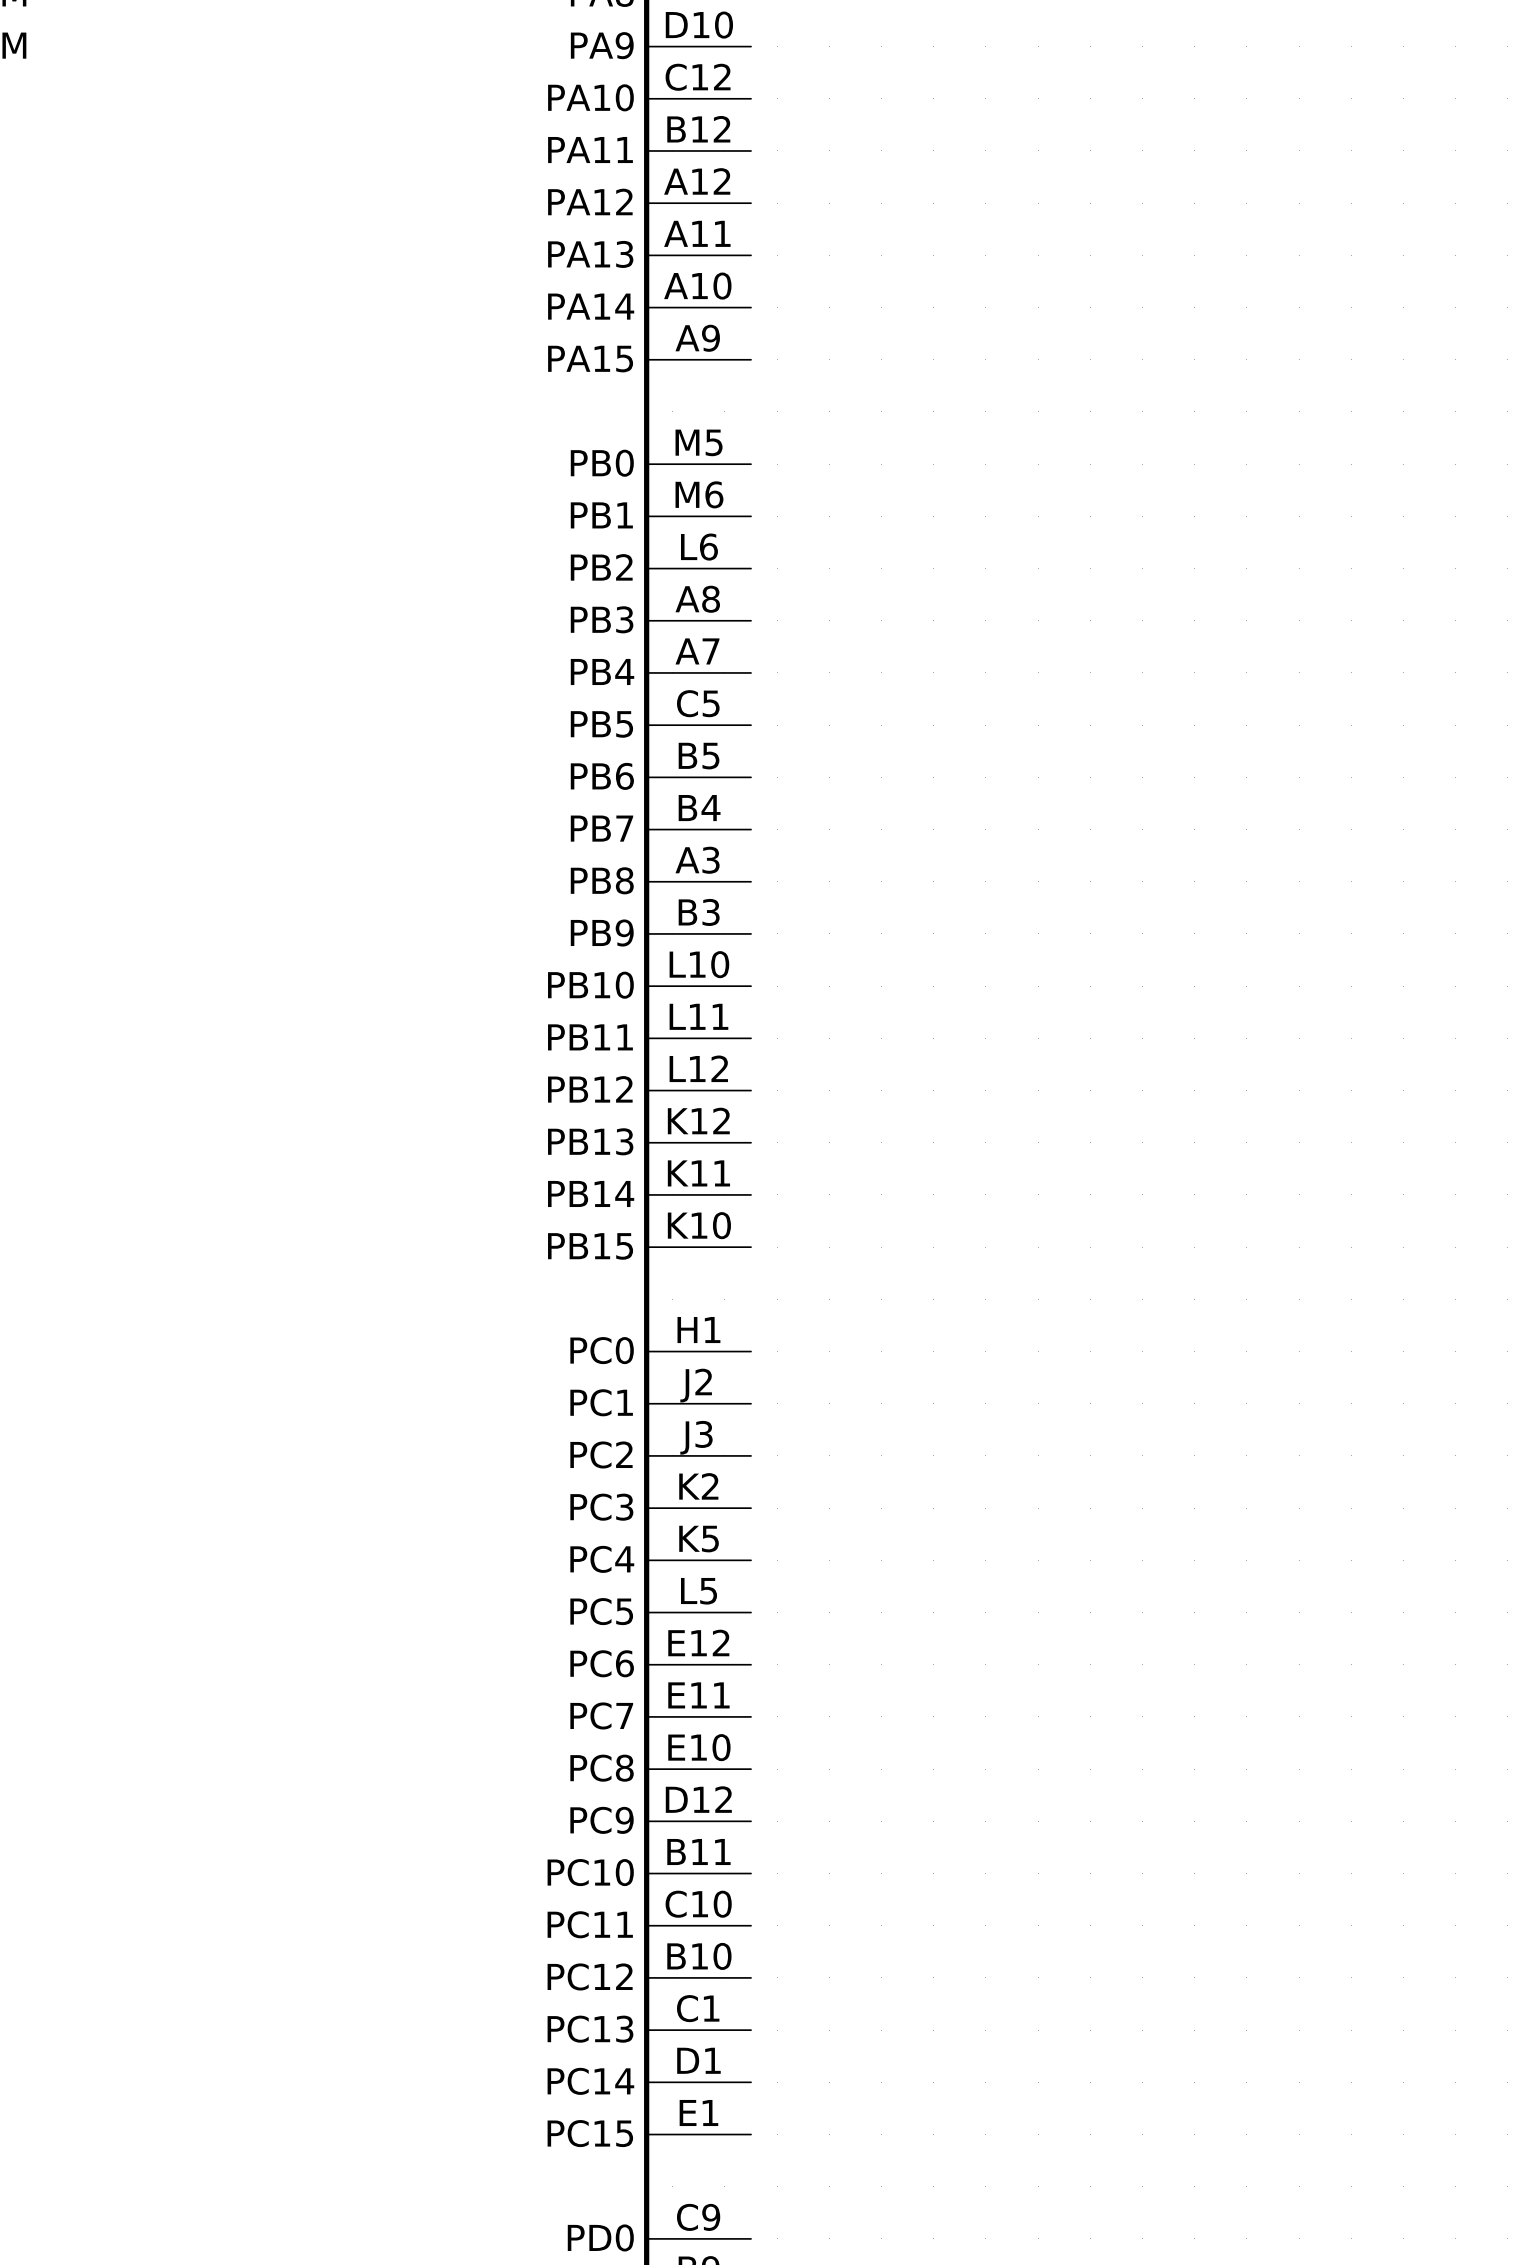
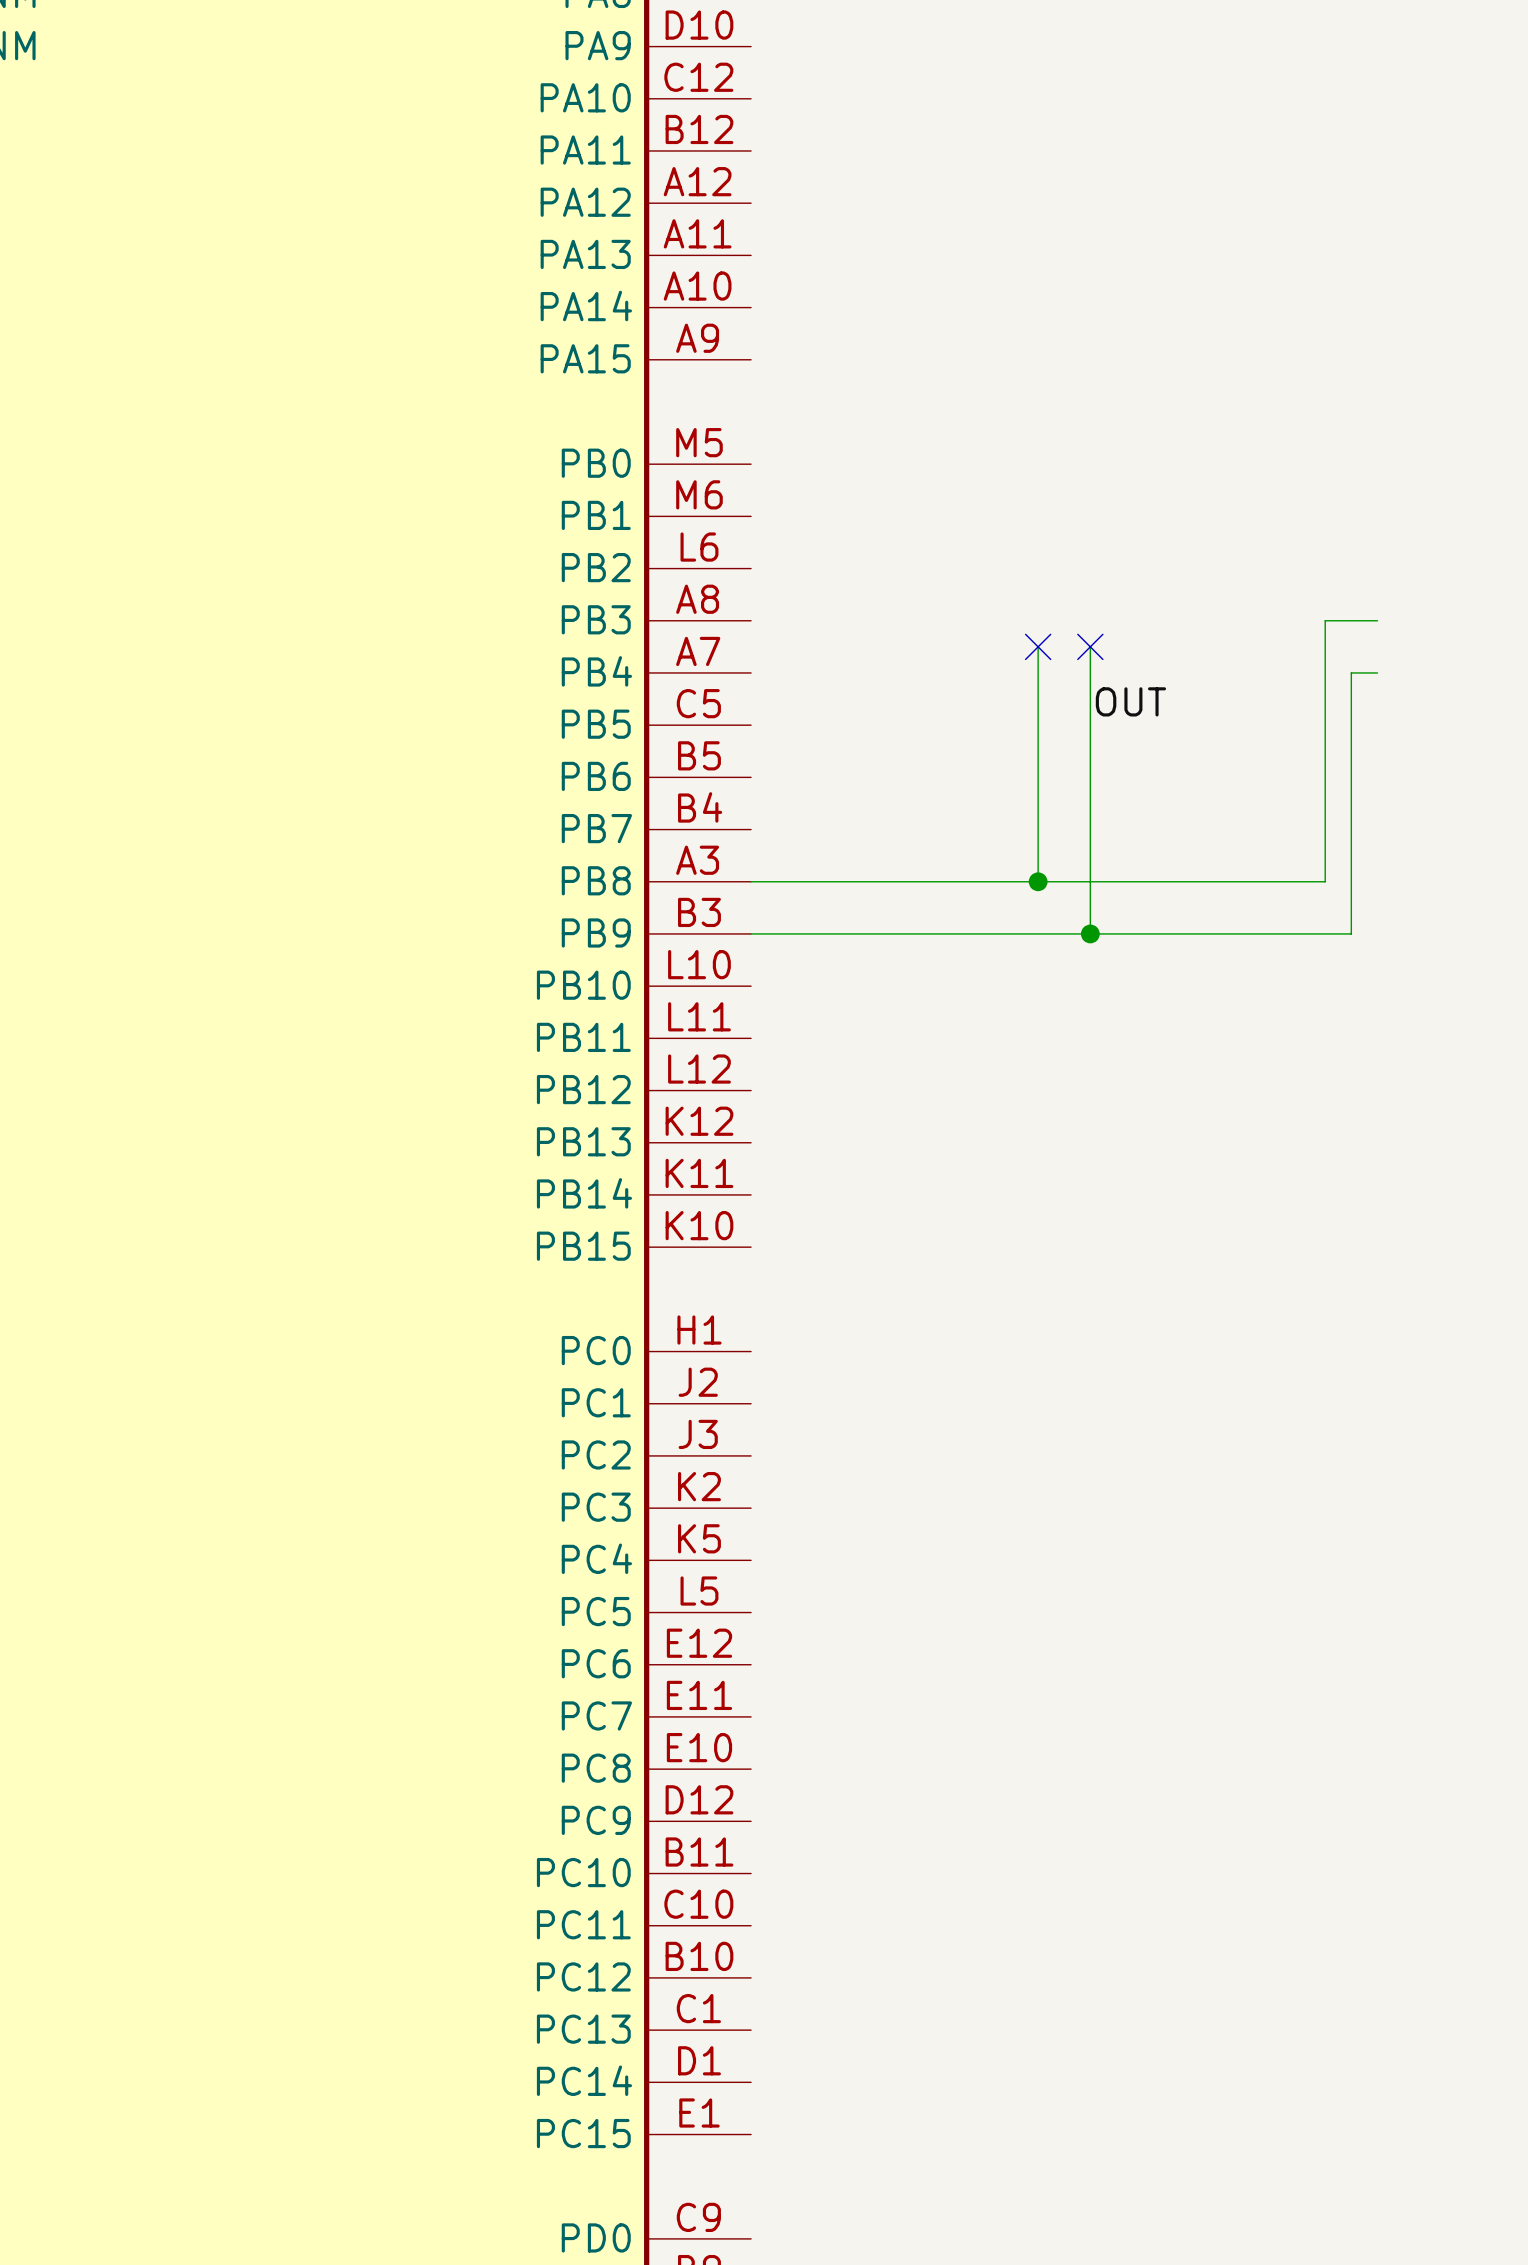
wire: none -> (1377, 620) (1325, 620) (1325, 881) (751, 881)
wire: none -> (1038, 646) (1038, 881)
no-connect mark: none -> (1038, 646)
wire: none -> (1090, 646) (1090, 933)
no-connect mark: none -> (1090, 646)
wire: none -> (1377, 672) (1351, 672) (1351, 933) (751, 933)
label: none -> OUT (1130, 701)
junction: none -> (1038, 881)
junction: none -> (1090, 933)

